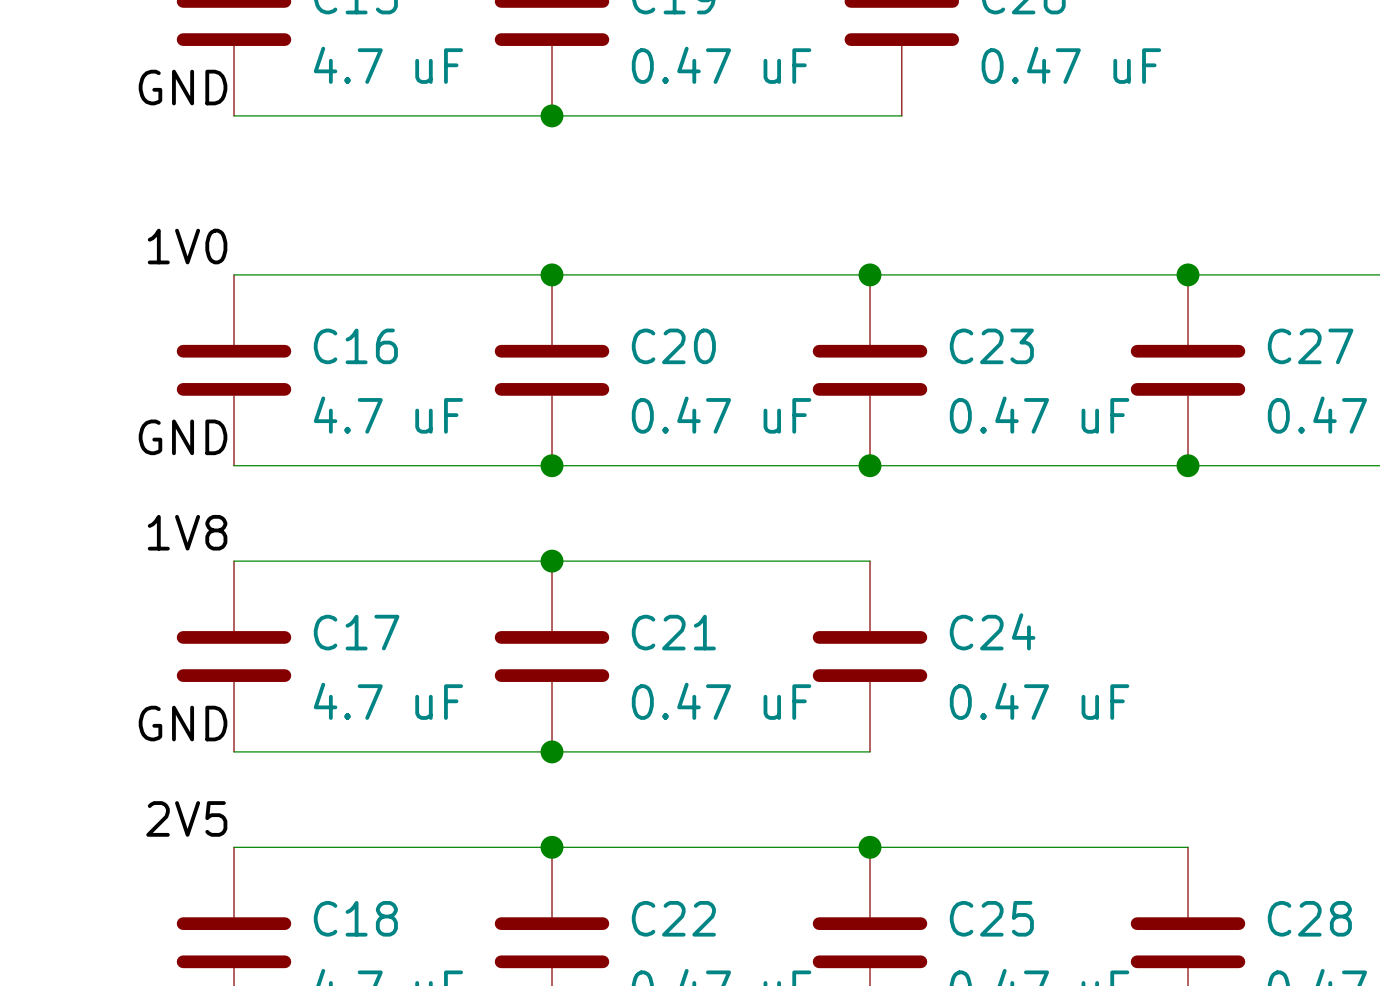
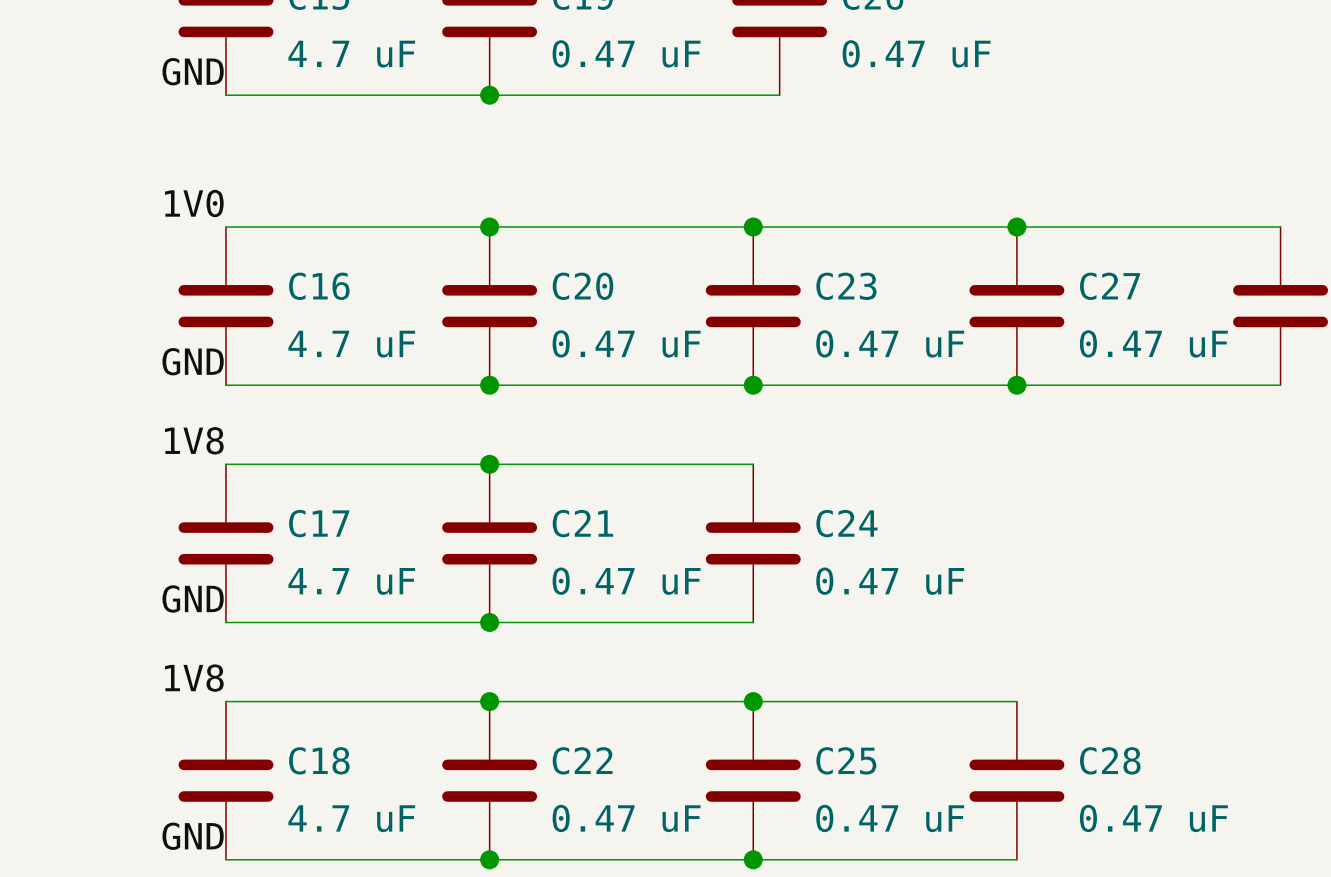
label: 2V5 (186, 818) -> 1V8 (194, 678)

